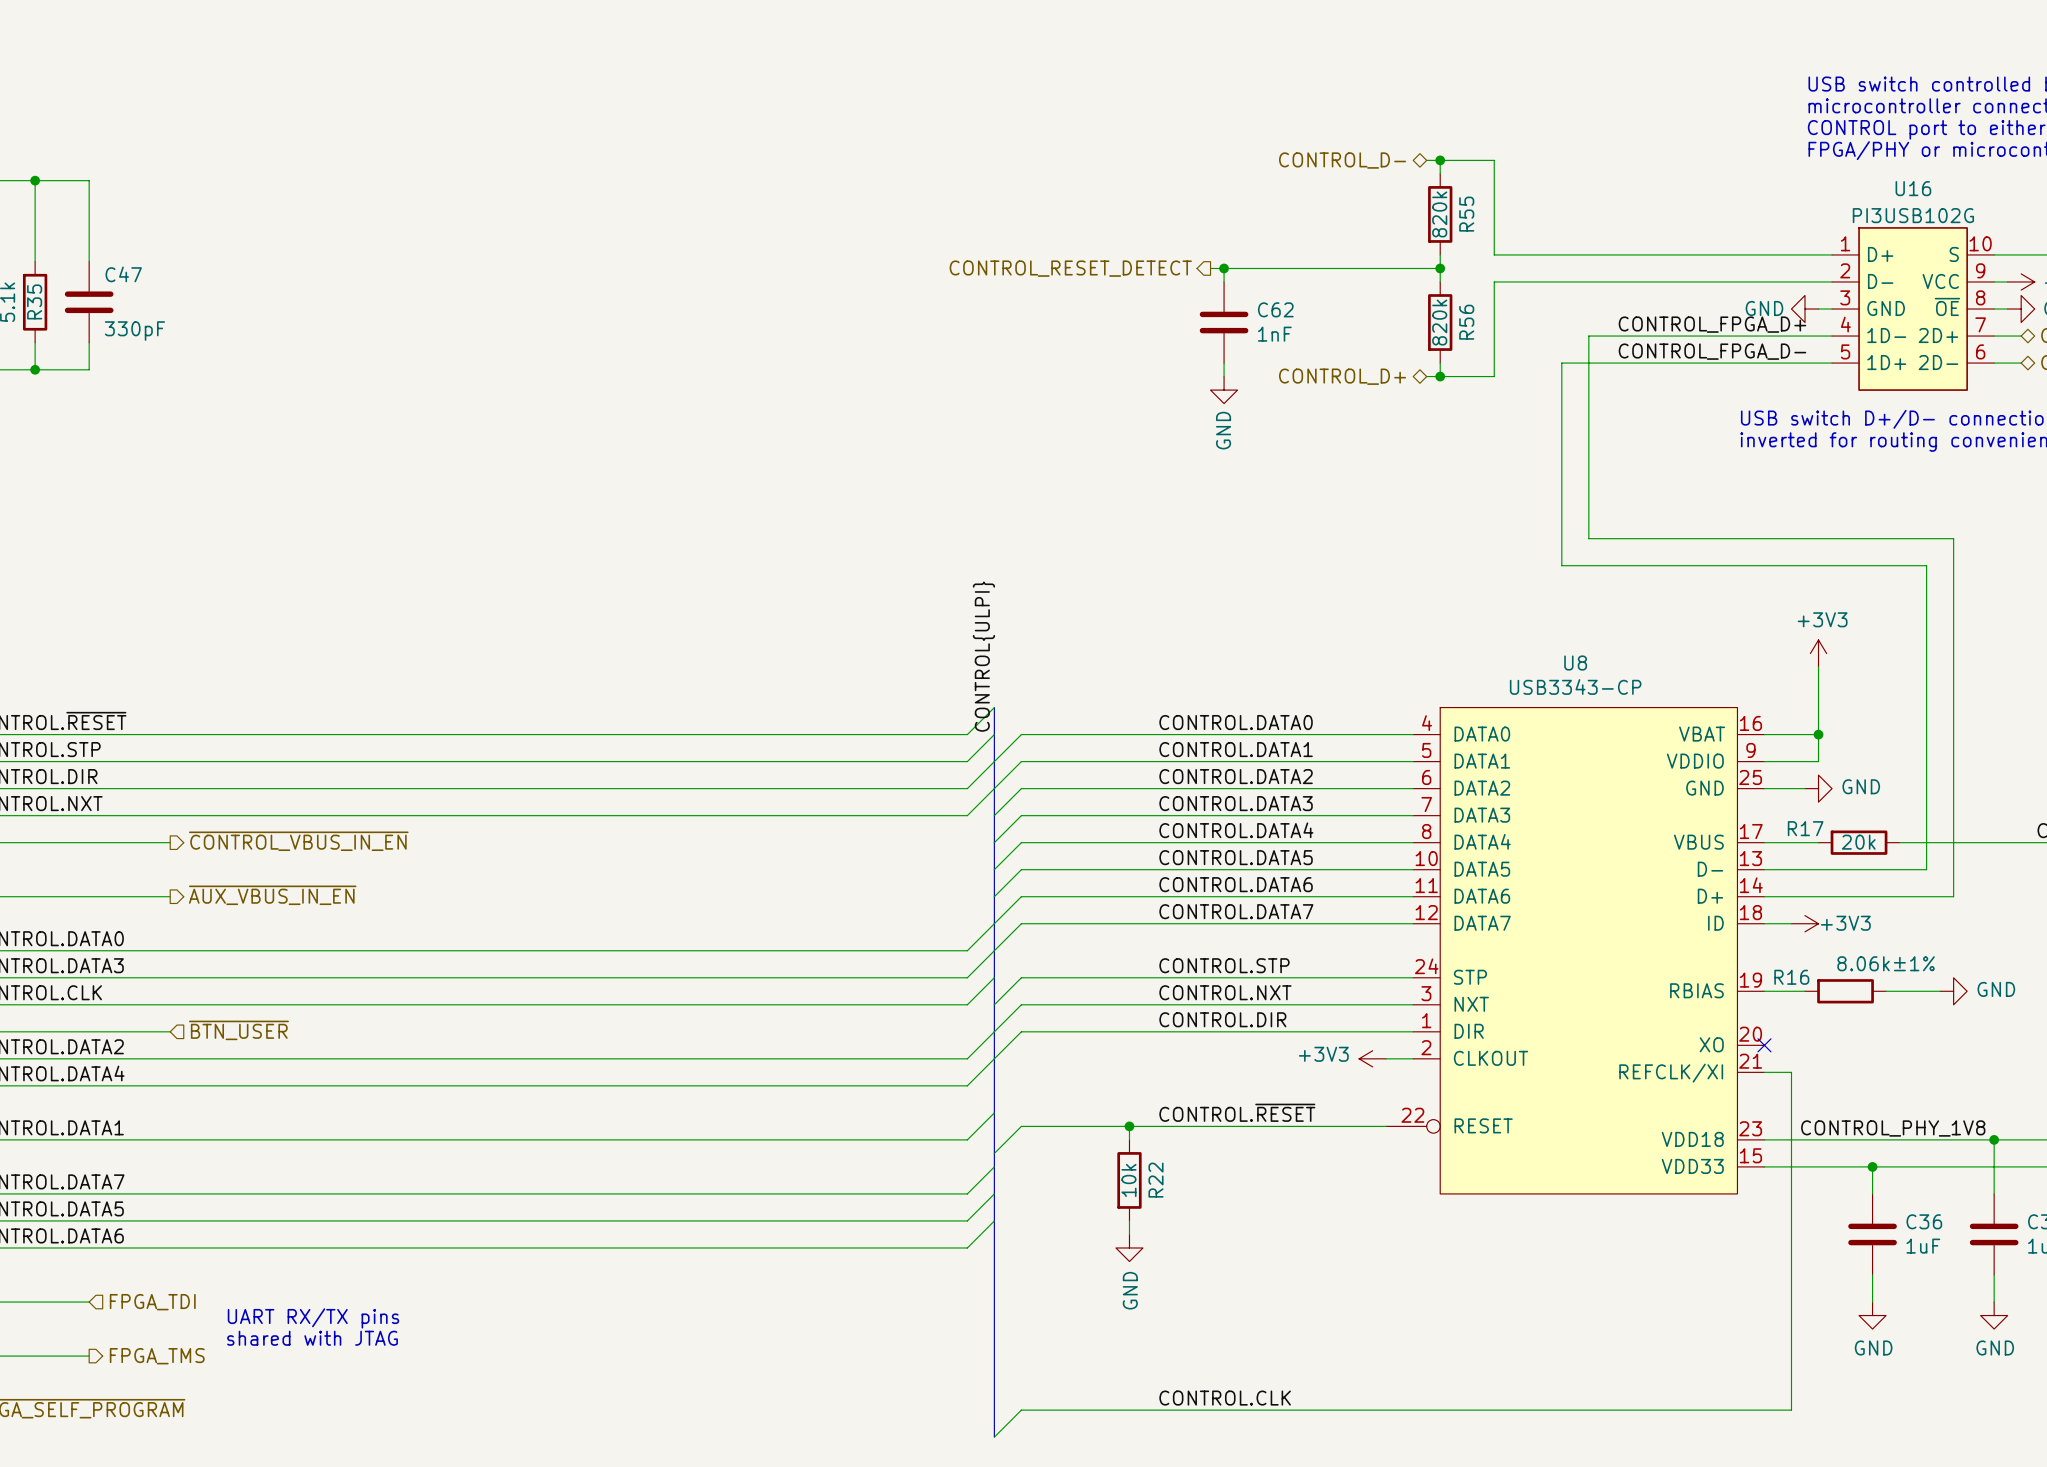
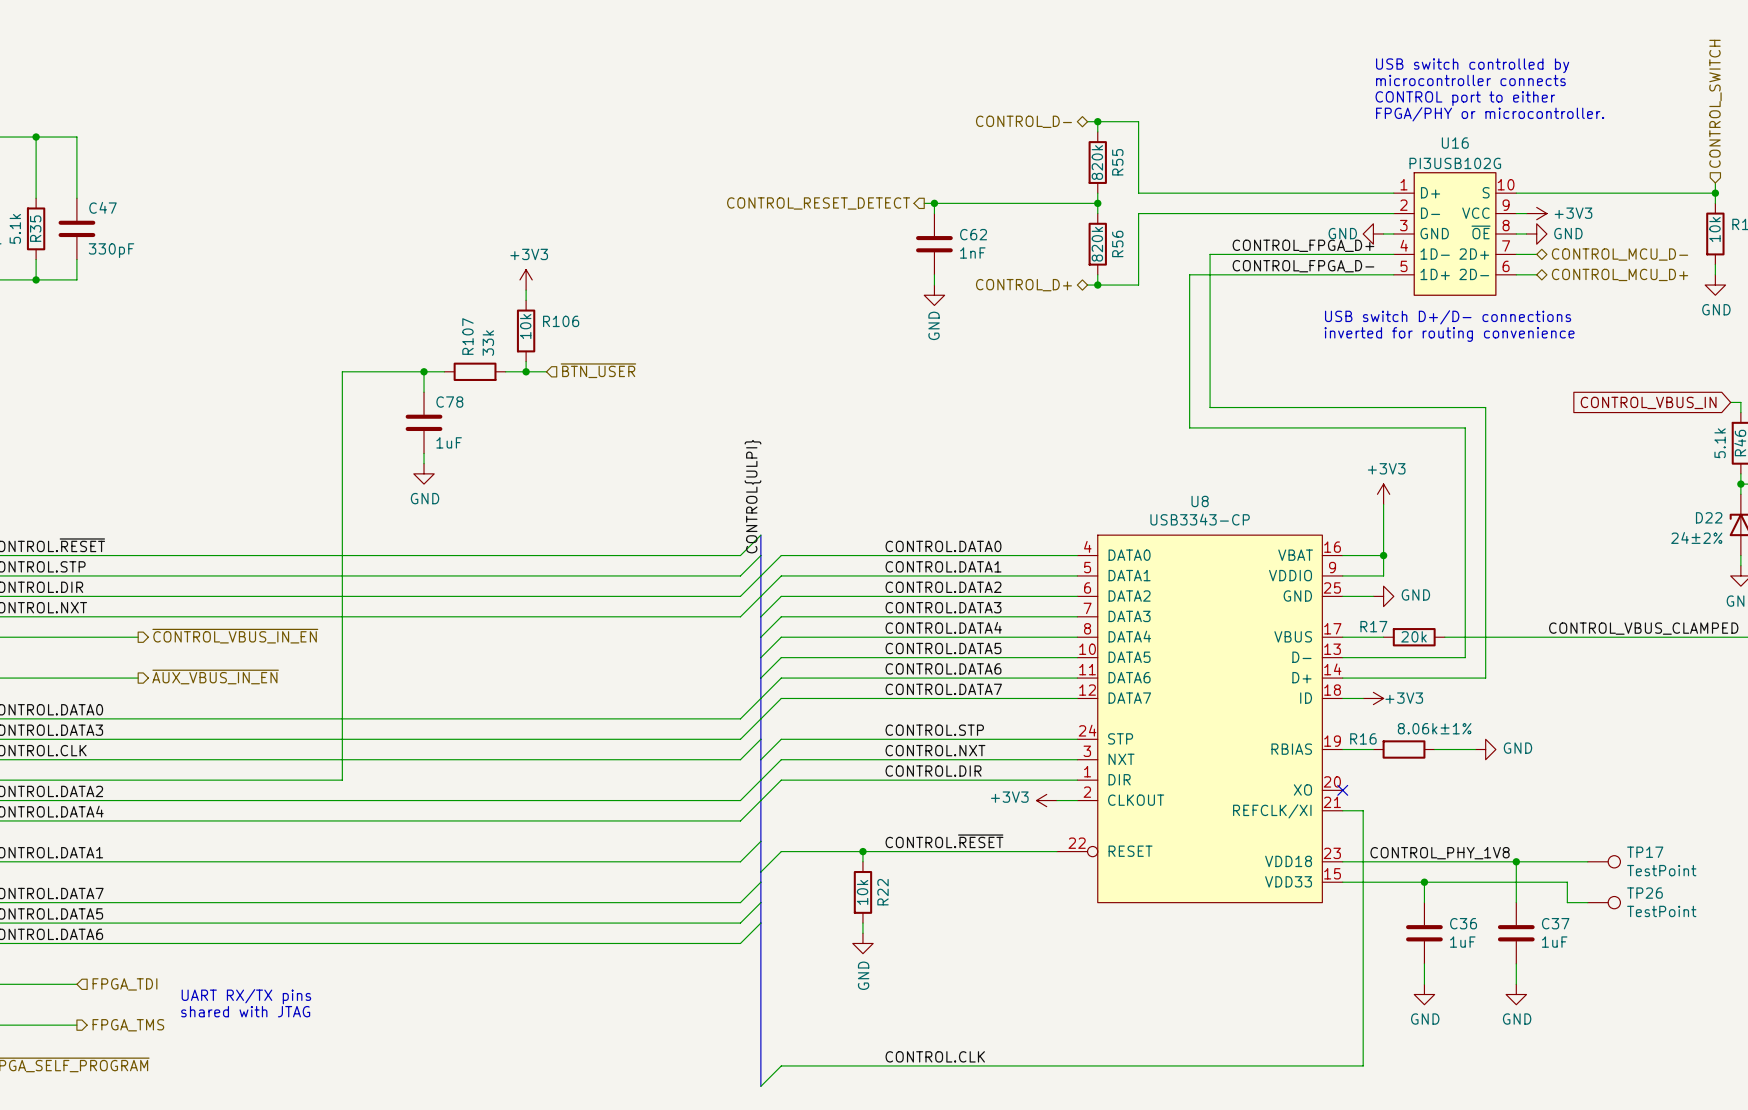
power symbol: none -> +3V3 (526, 279)
wire: none -> (526, 290) (526, 300)
R106: none -> 10k (526, 330)
wire: none -> (526, 361) (526, 371)
hierarchical label: none -> ~{BTN_USER} (598, 370)
wire: none -> (424, 371) (424, 392)
junction: none -> (424, 371)
wire: none -> (444, 371) (342, 371) (342, 780) (138, 780)
R107: none -> 33k (475, 371)
wire: none -> (505, 371) (546, 371)
junction: none -> (526, 371)
C78: none -> 1uF (424, 422)
wire: none -> (424, 453) (424, 463)
power symbol: none -> GND (424, 473)
hierarchical label: ~{BTN_USER} (238, 1030) -> none

